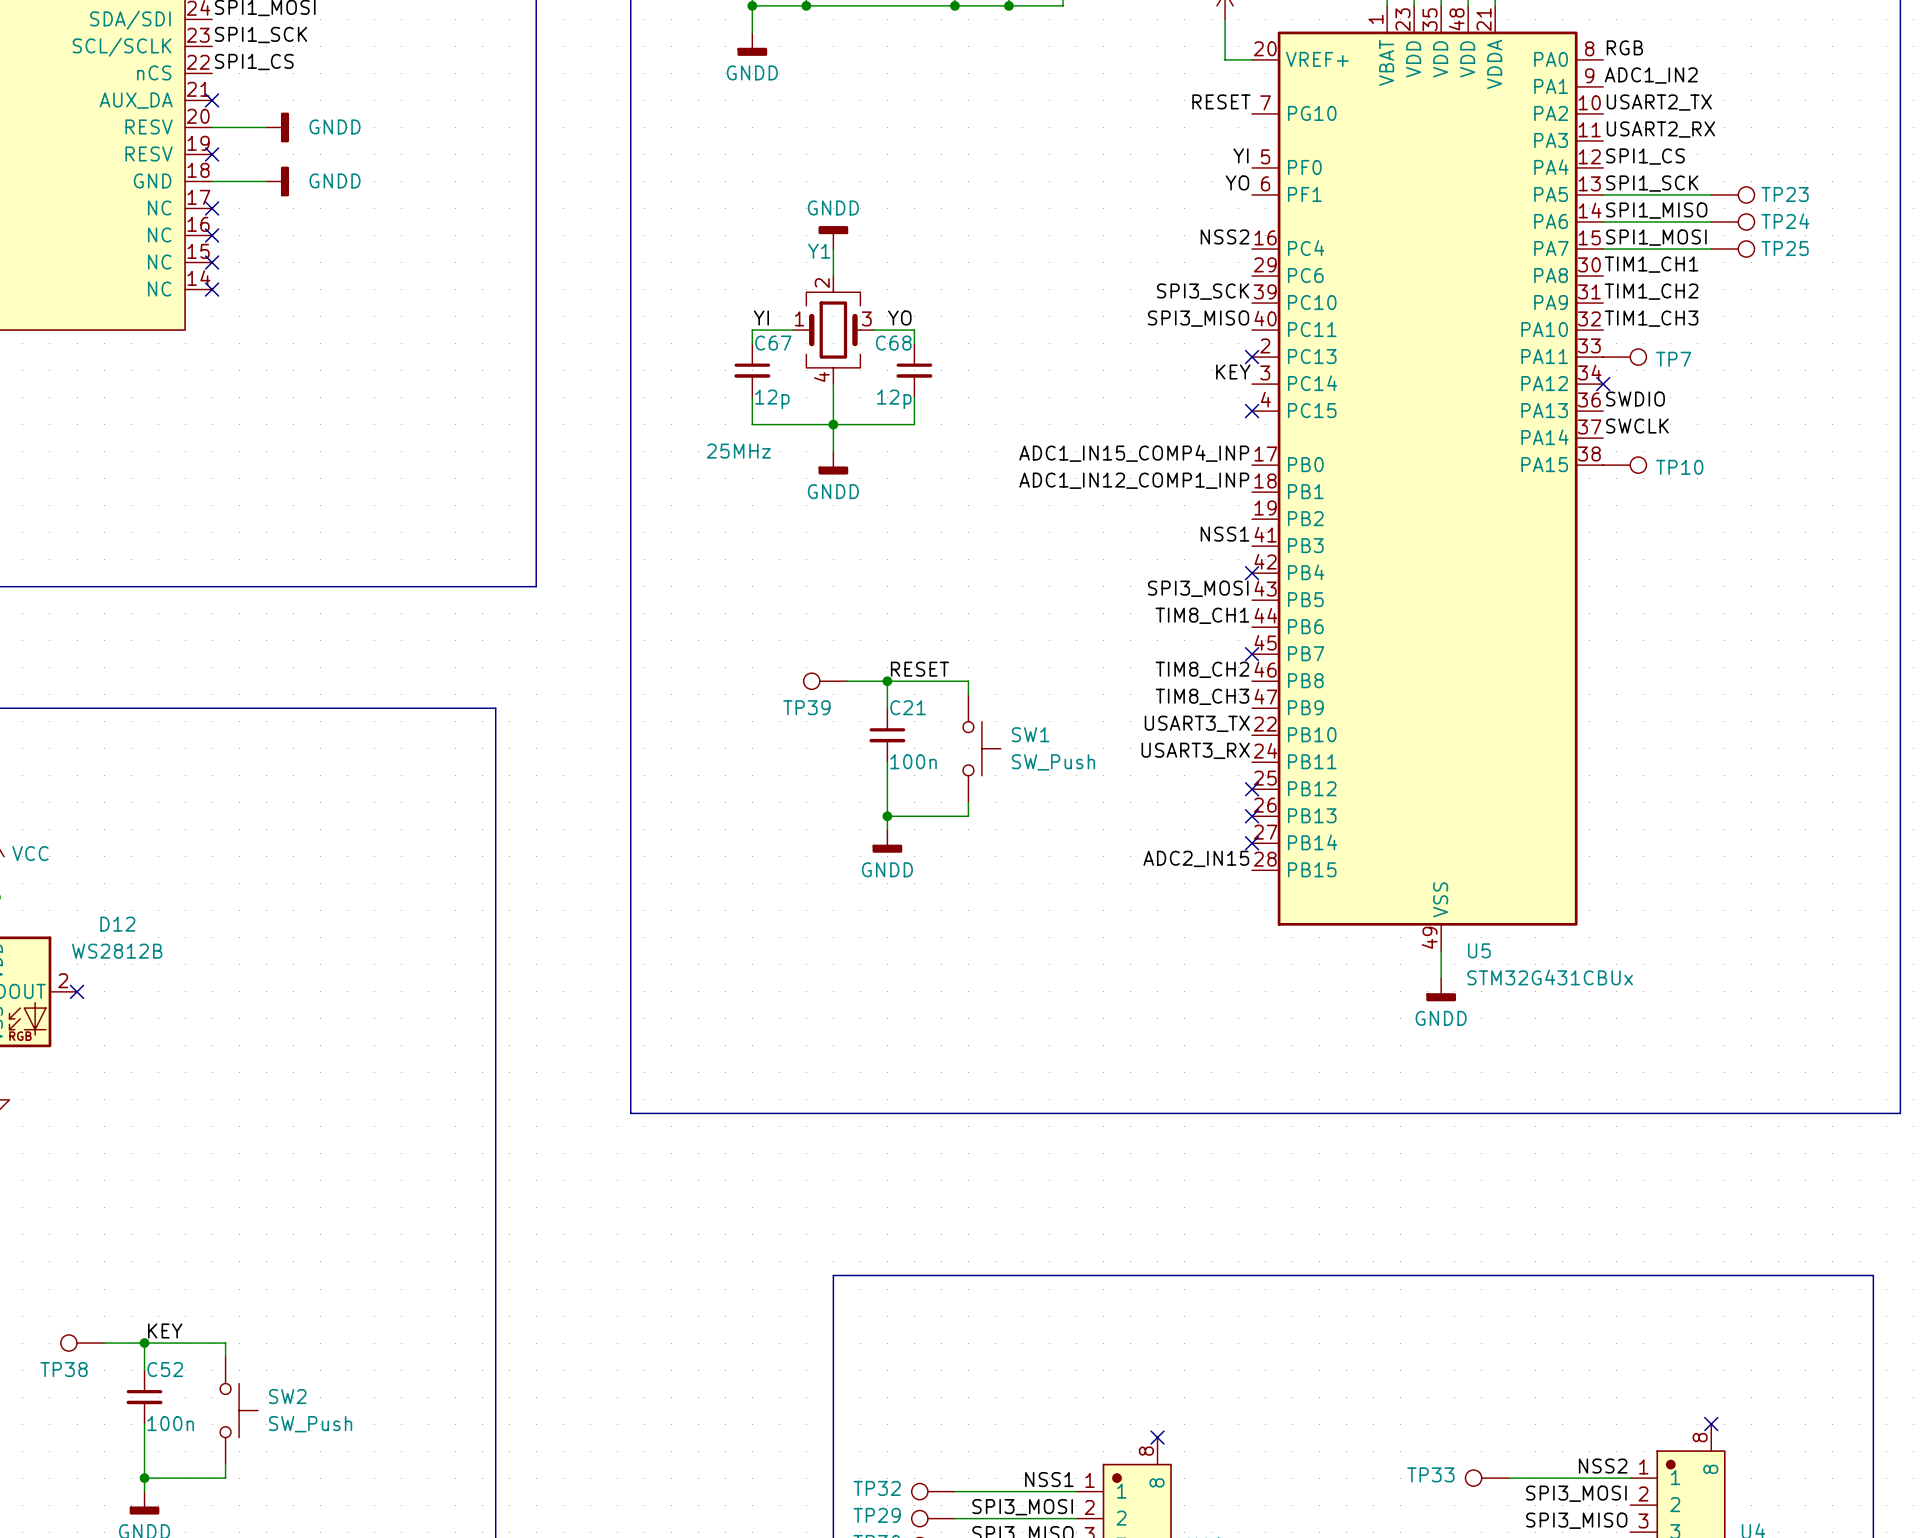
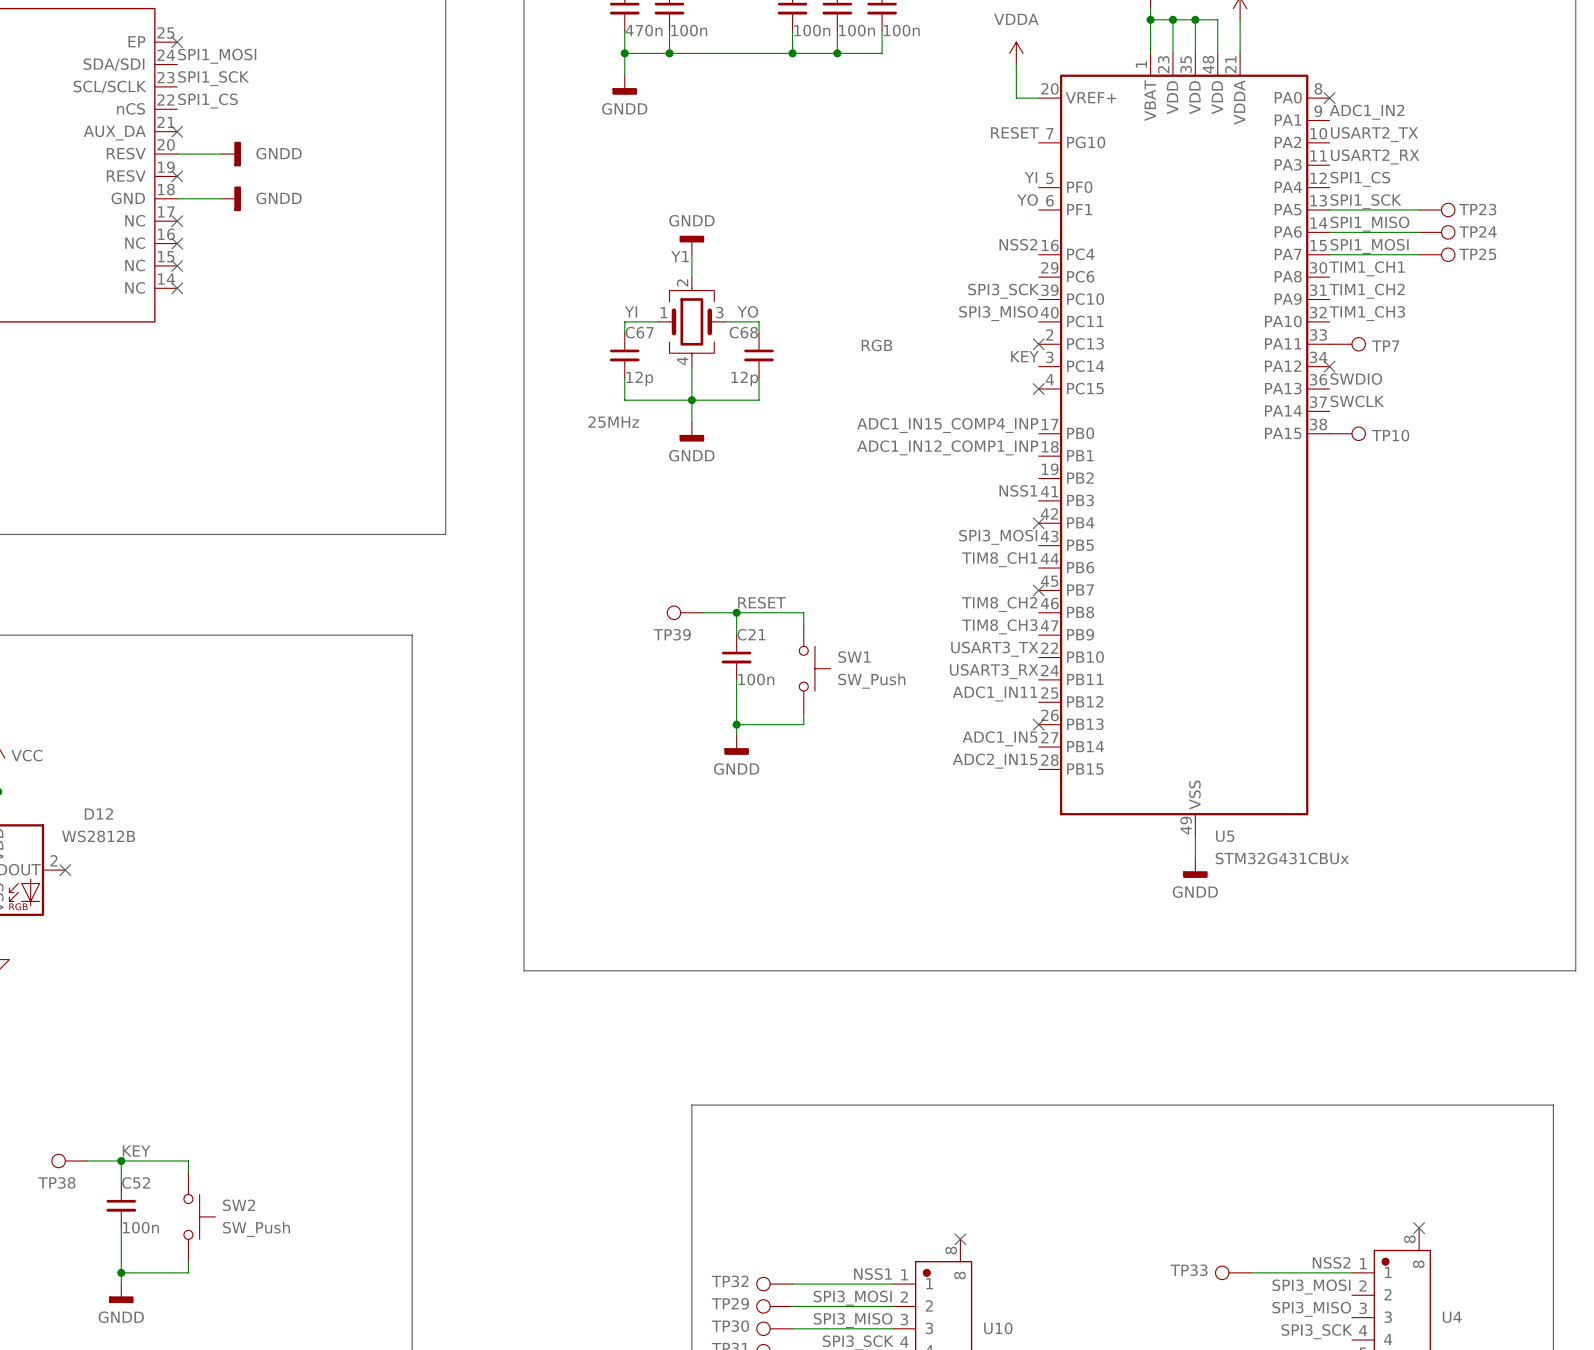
label: RGB (1624, 47) -> none
no-connect mark: none -> (1329, 98)
label: none -> RGB (876, 345)
label: none -> ADC1_IN11 (995, 694)
no-connect mark: (1252, 789) -> none
label: none -> ADC1_IN5 (999, 738)
no-connect mark: (1252, 843) -> none

